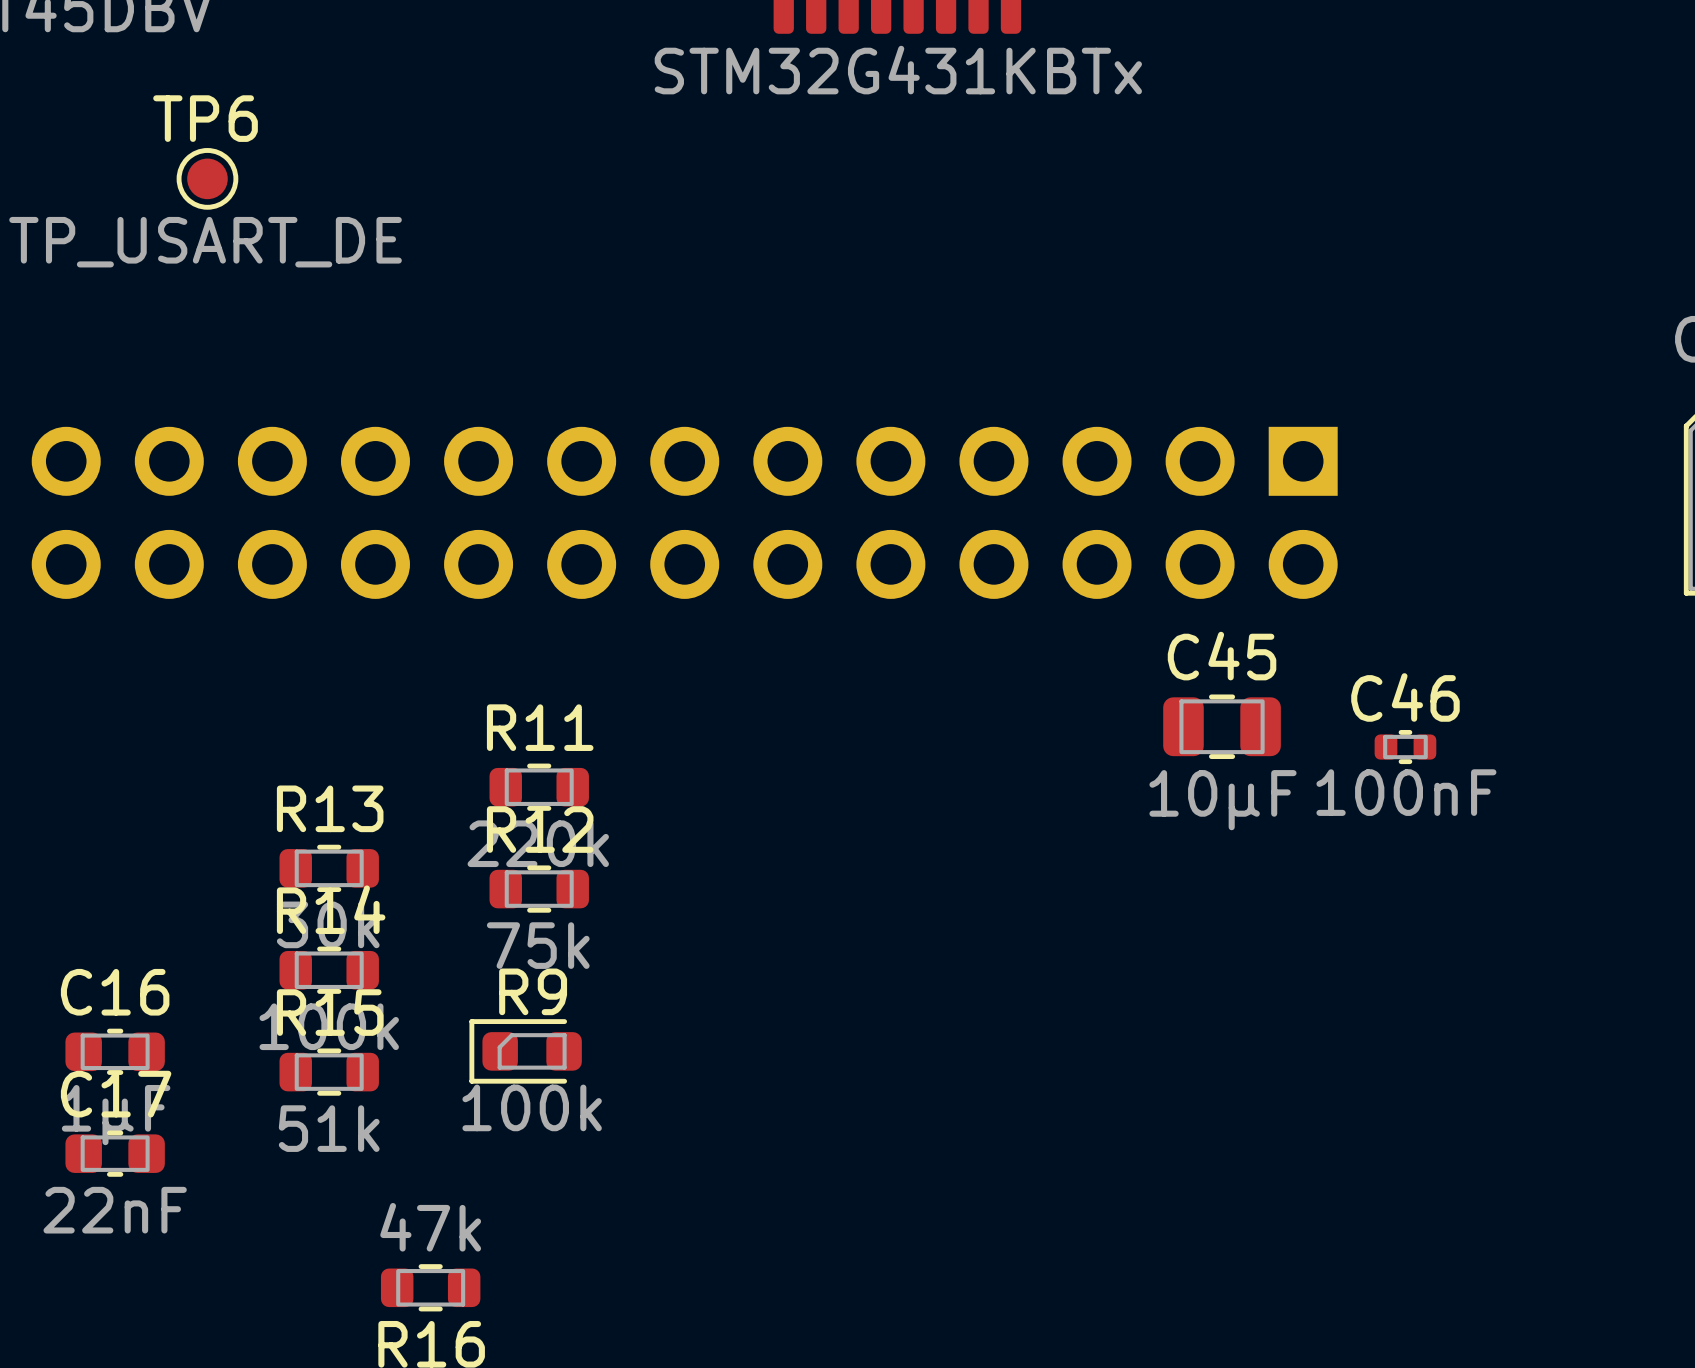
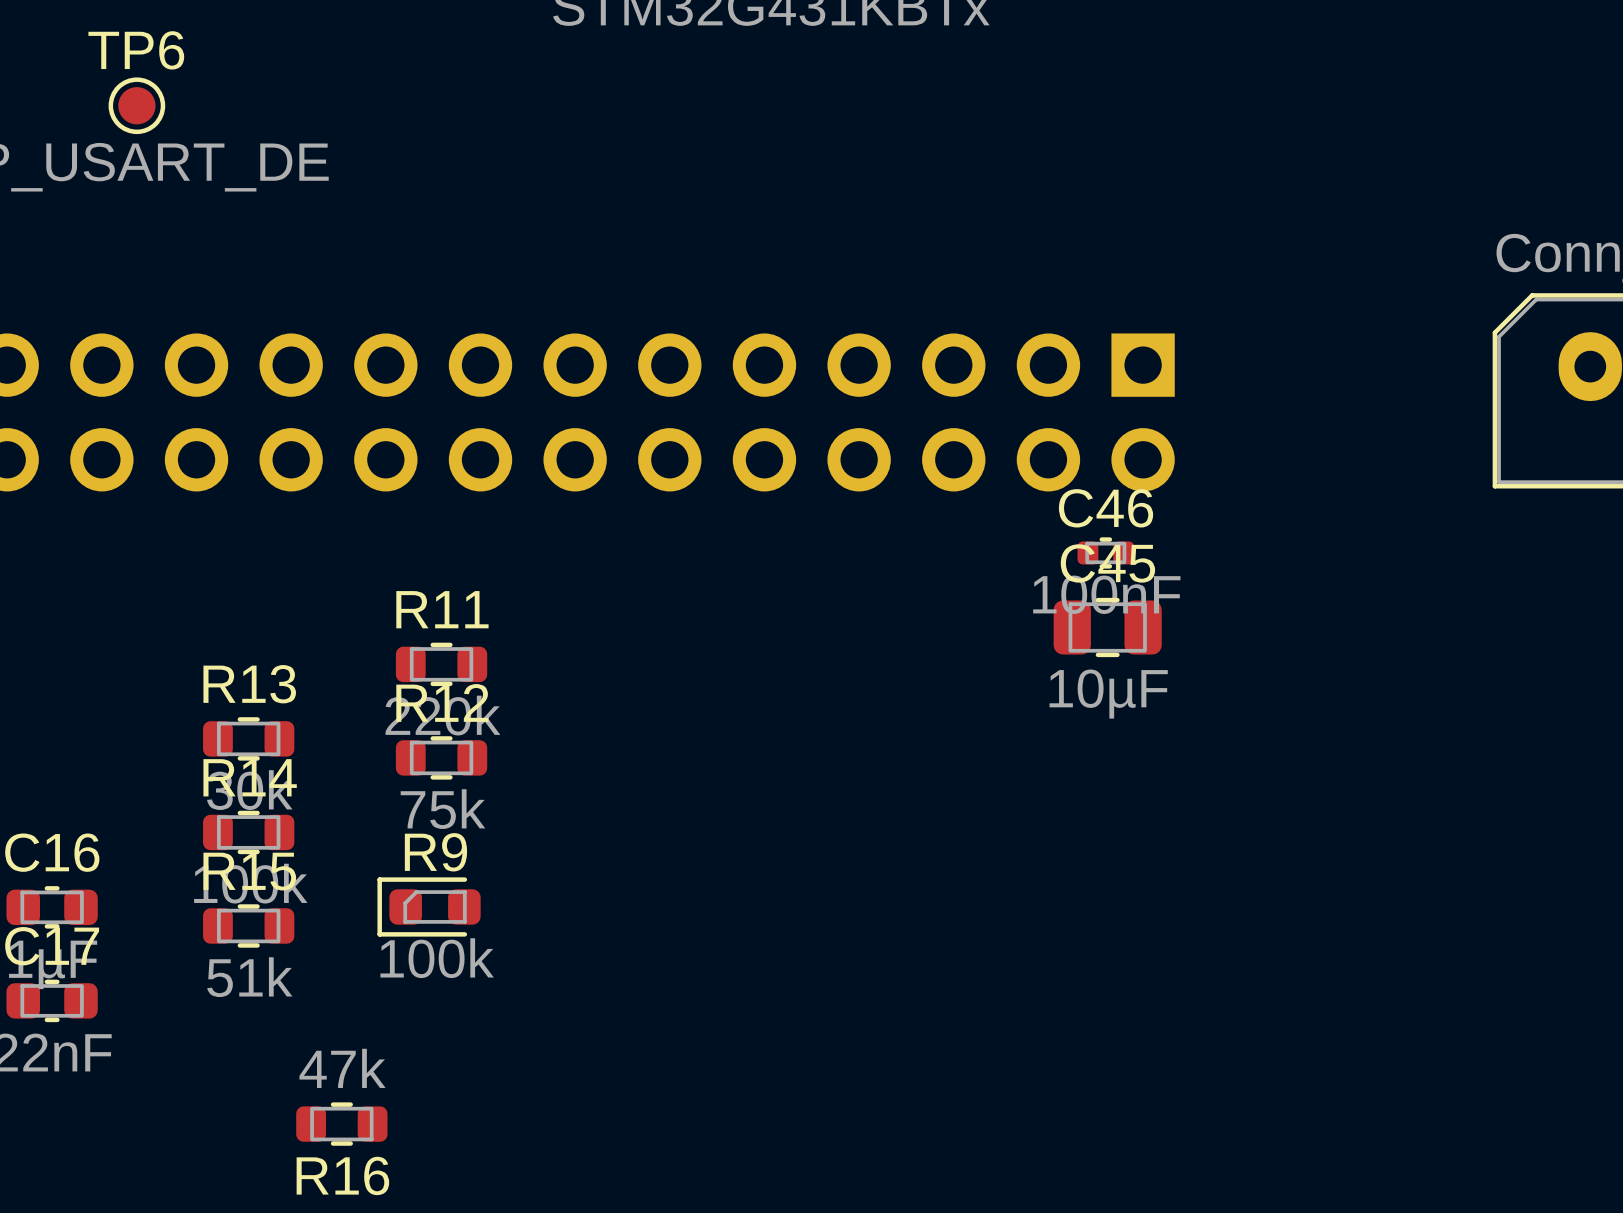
C45 position: (1222, 726) -> (1107, 627)
C46 position: (1405, 747) -> (1105, 552)

